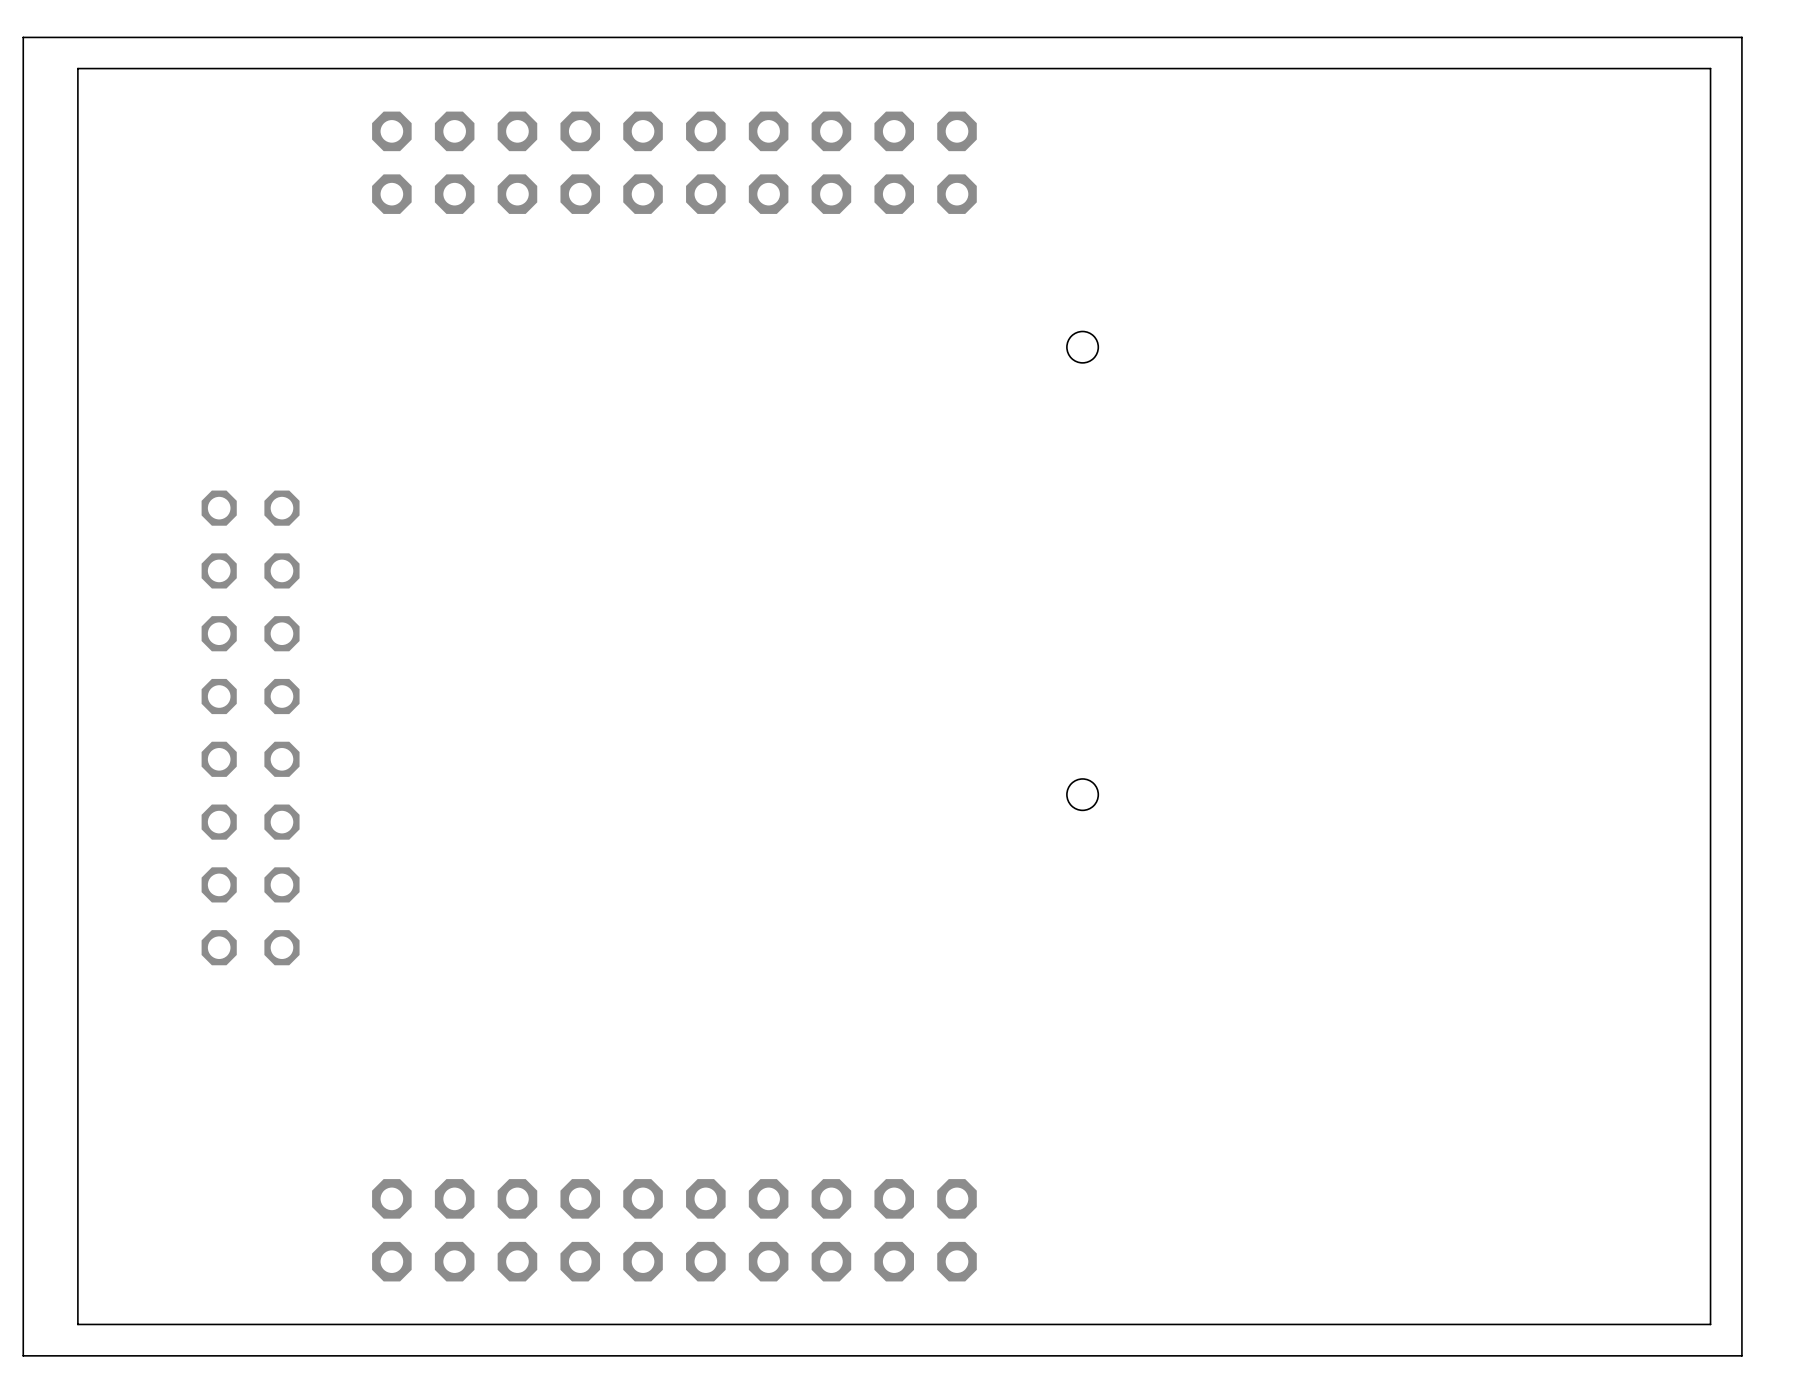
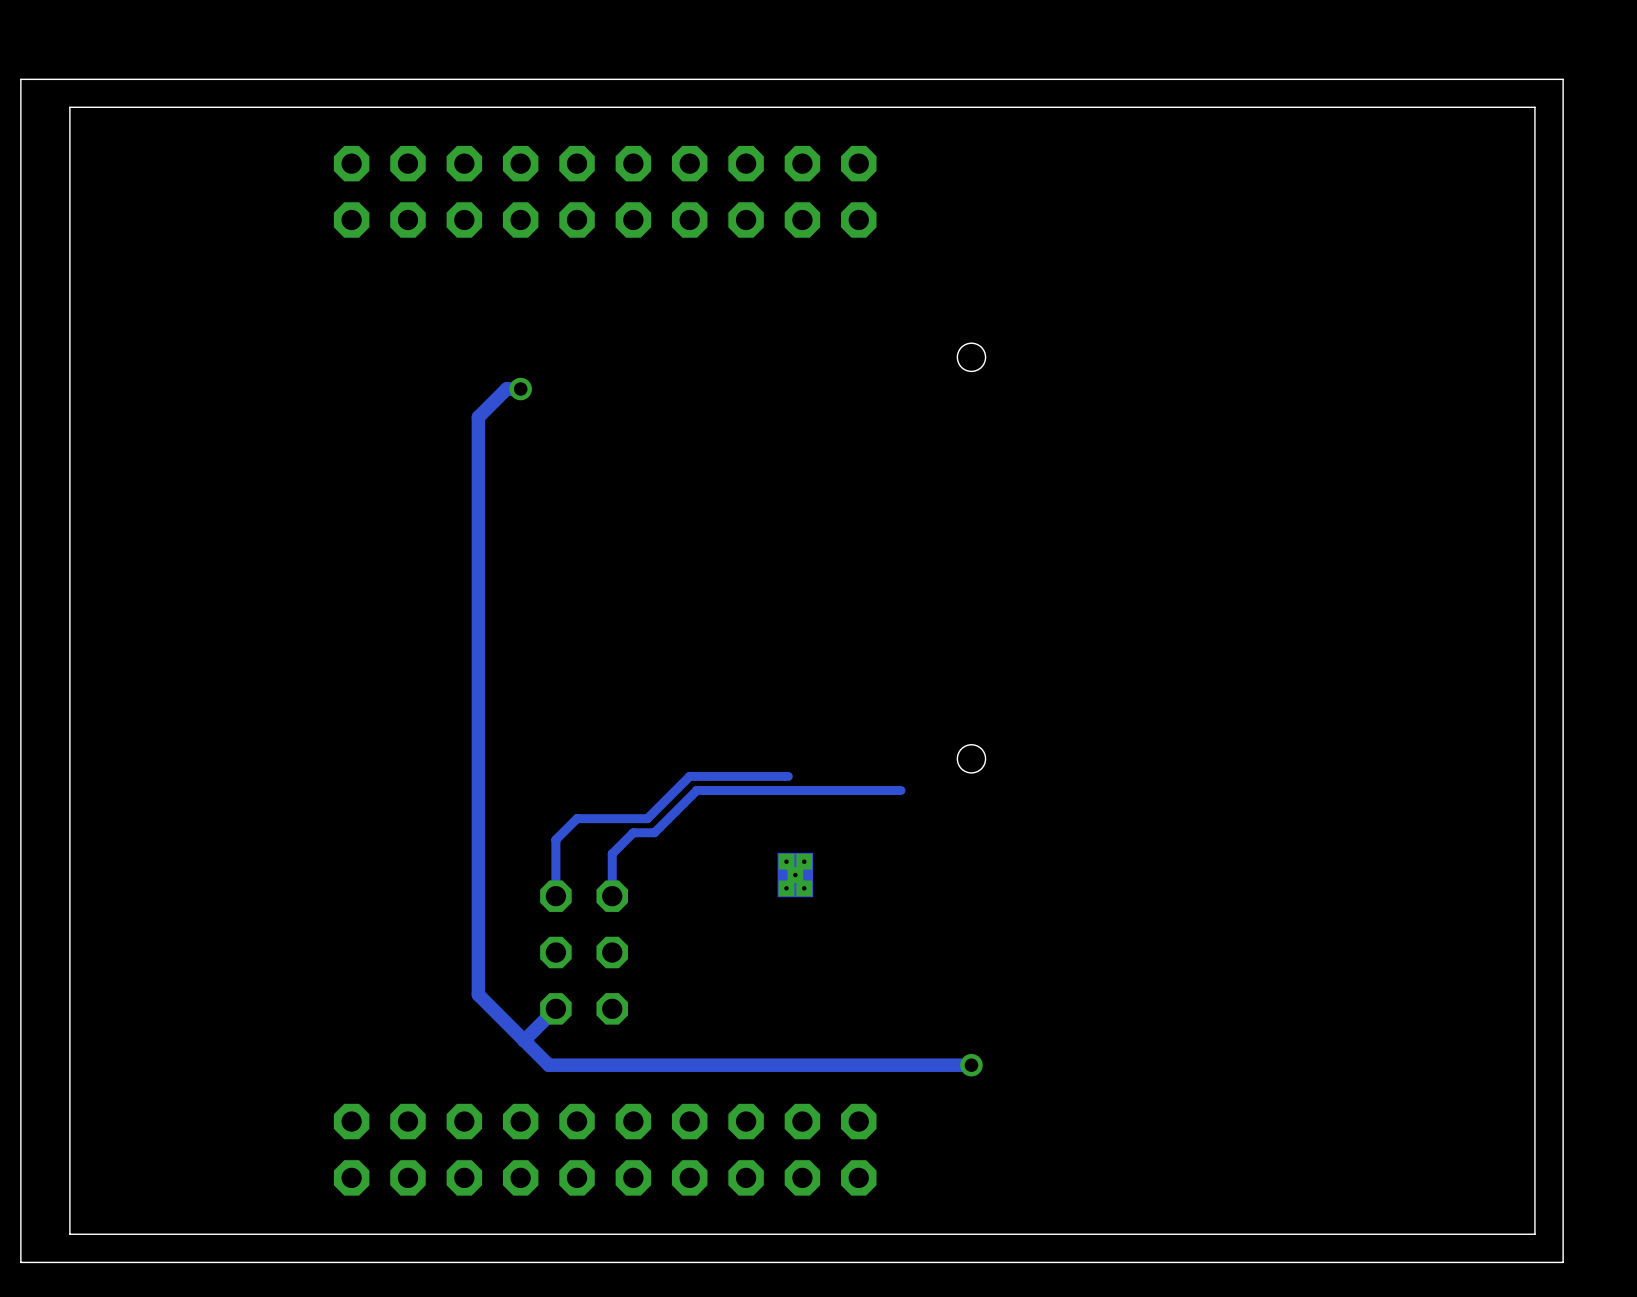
track: none -> (520, 389) (506, 389) (478, 417) (478, 994) (548, 1065) (971, 1065)
via: none -> (520, 389)
part: (250, 727) -> none
track: none -> (788, 776) (689, 776) (647, 818) (577, 818) (555, 839) (555, 896)
track: none -> (901, 790) (696, 790) (654, 832) (633, 832) (612, 853) (612, 896)
part: none -> (795, 875)
part: none -> (584, 952)
track: none -> (555, 1008) (524, 1040)
via: none -> (971, 1065)

